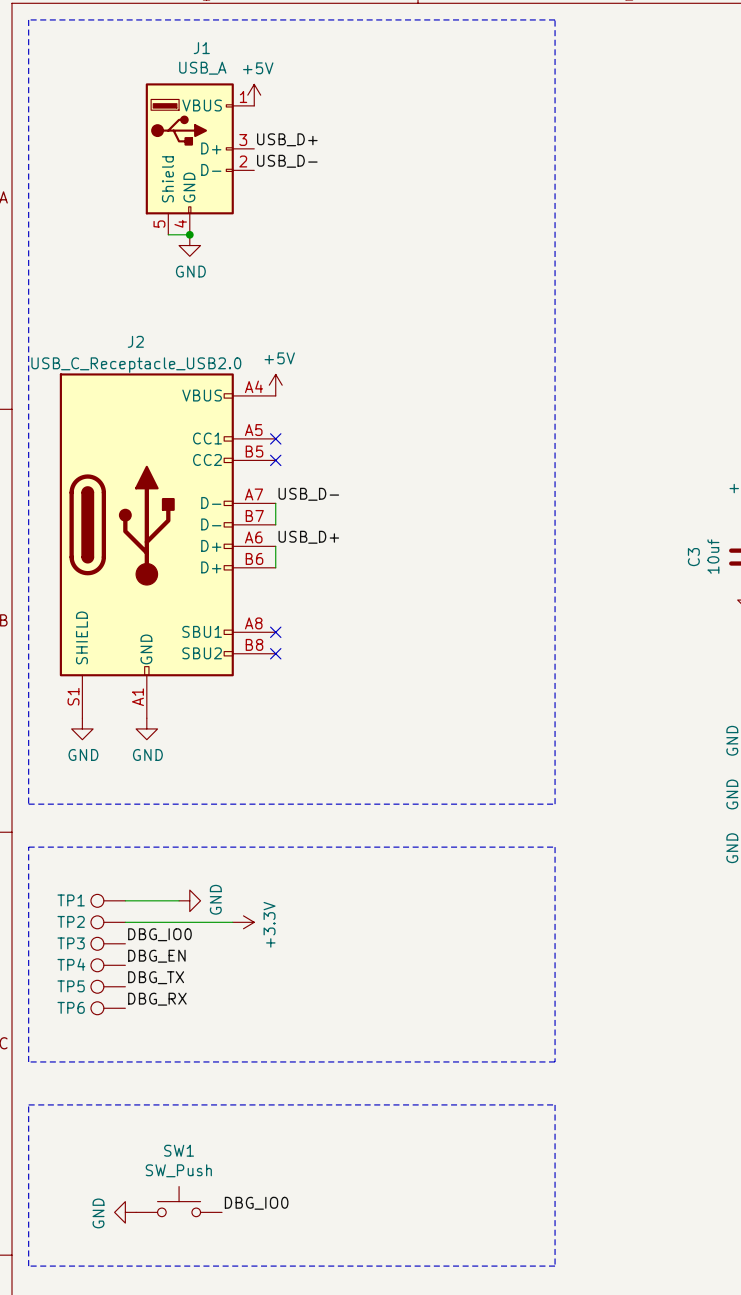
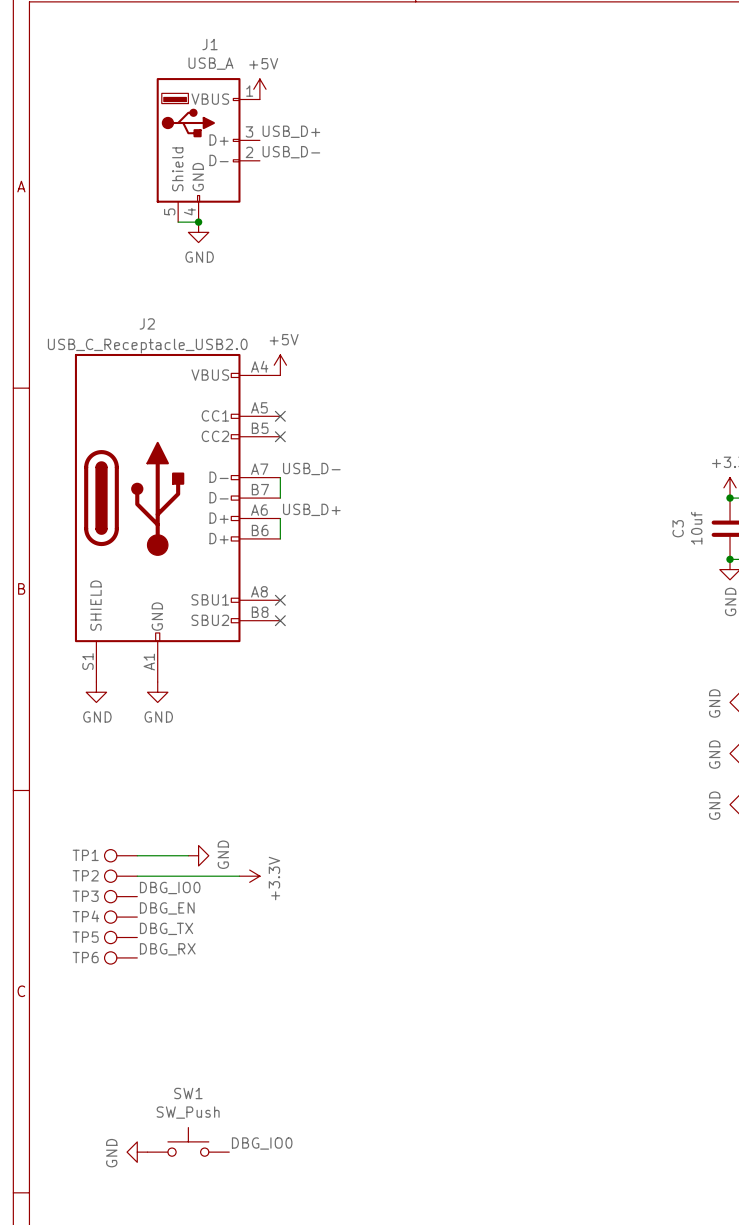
line: (28, 19) (555, 19) (555, 804) (28, 804) (28, 19) -> none
line: (28, 847) (28, 1061) (555, 1061) (555, 847) (28, 847) -> none
line: (28, 1104) (28, 1266) (555, 1266) (555, 1104) (28, 1104) -> none

